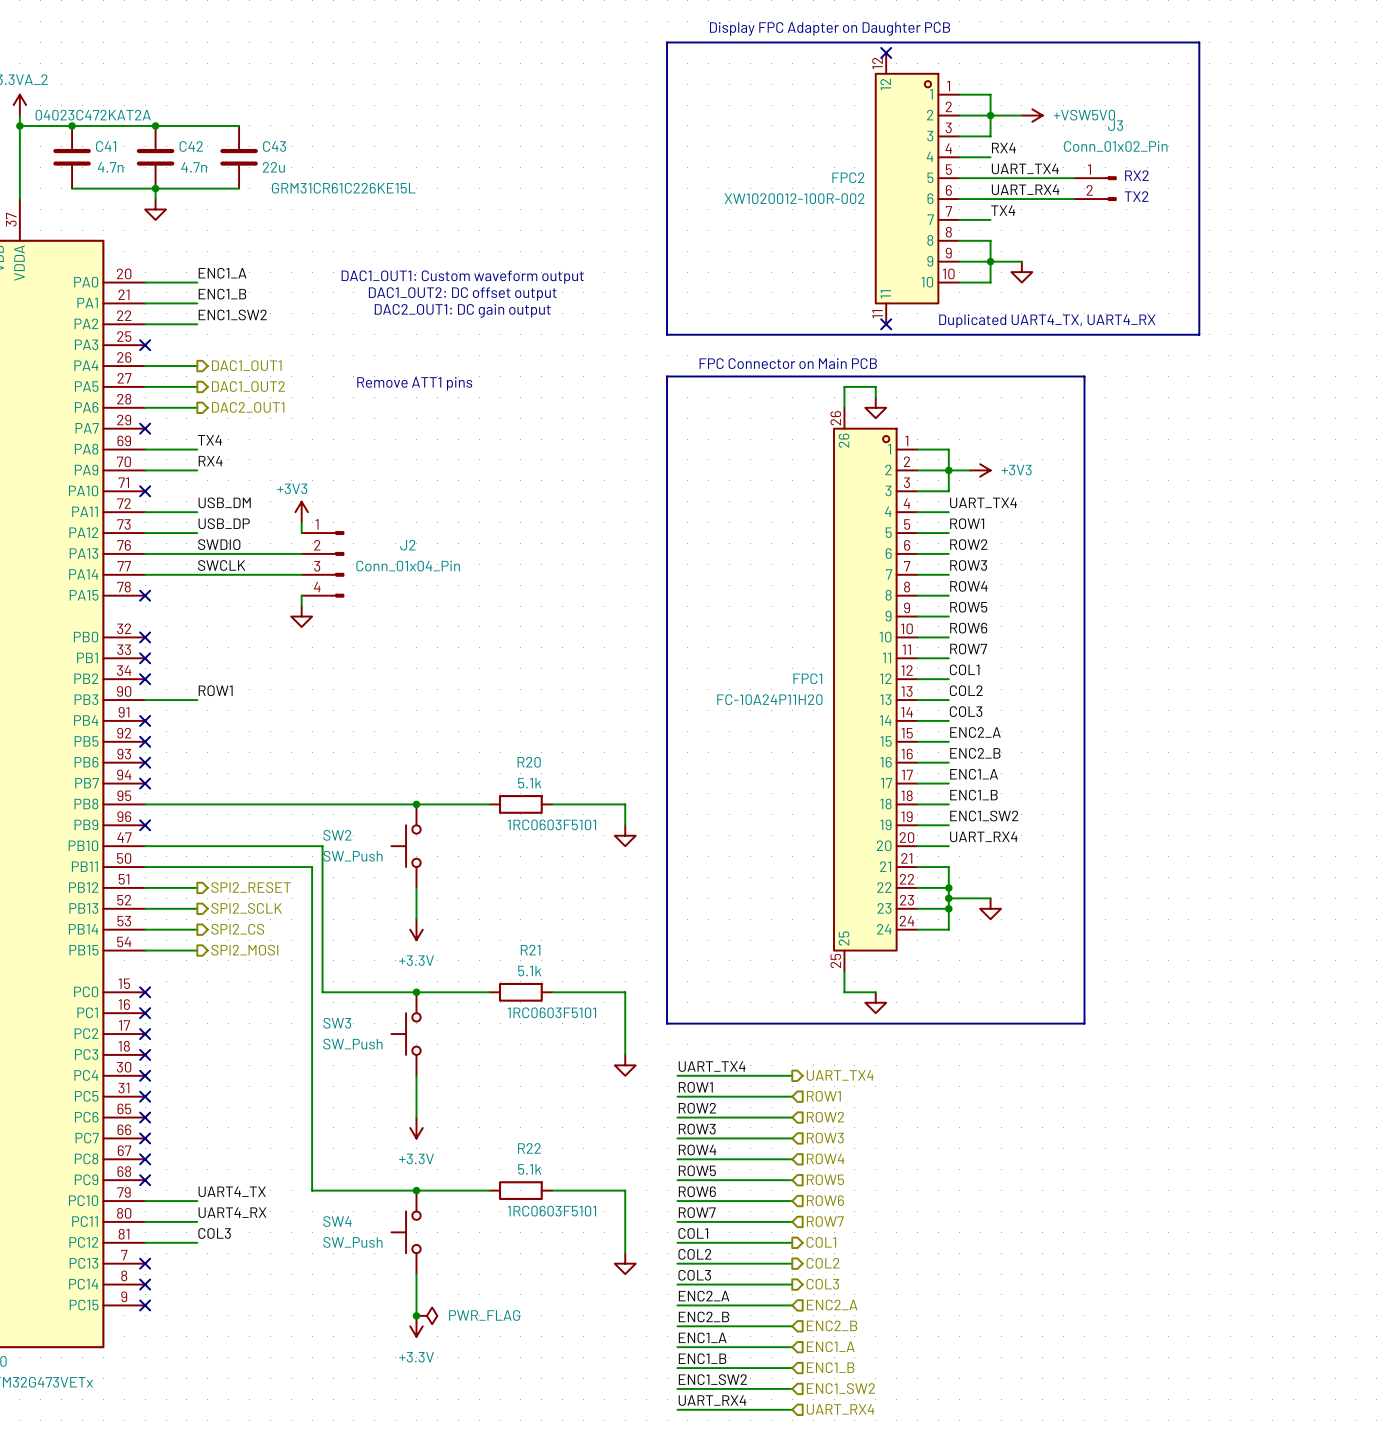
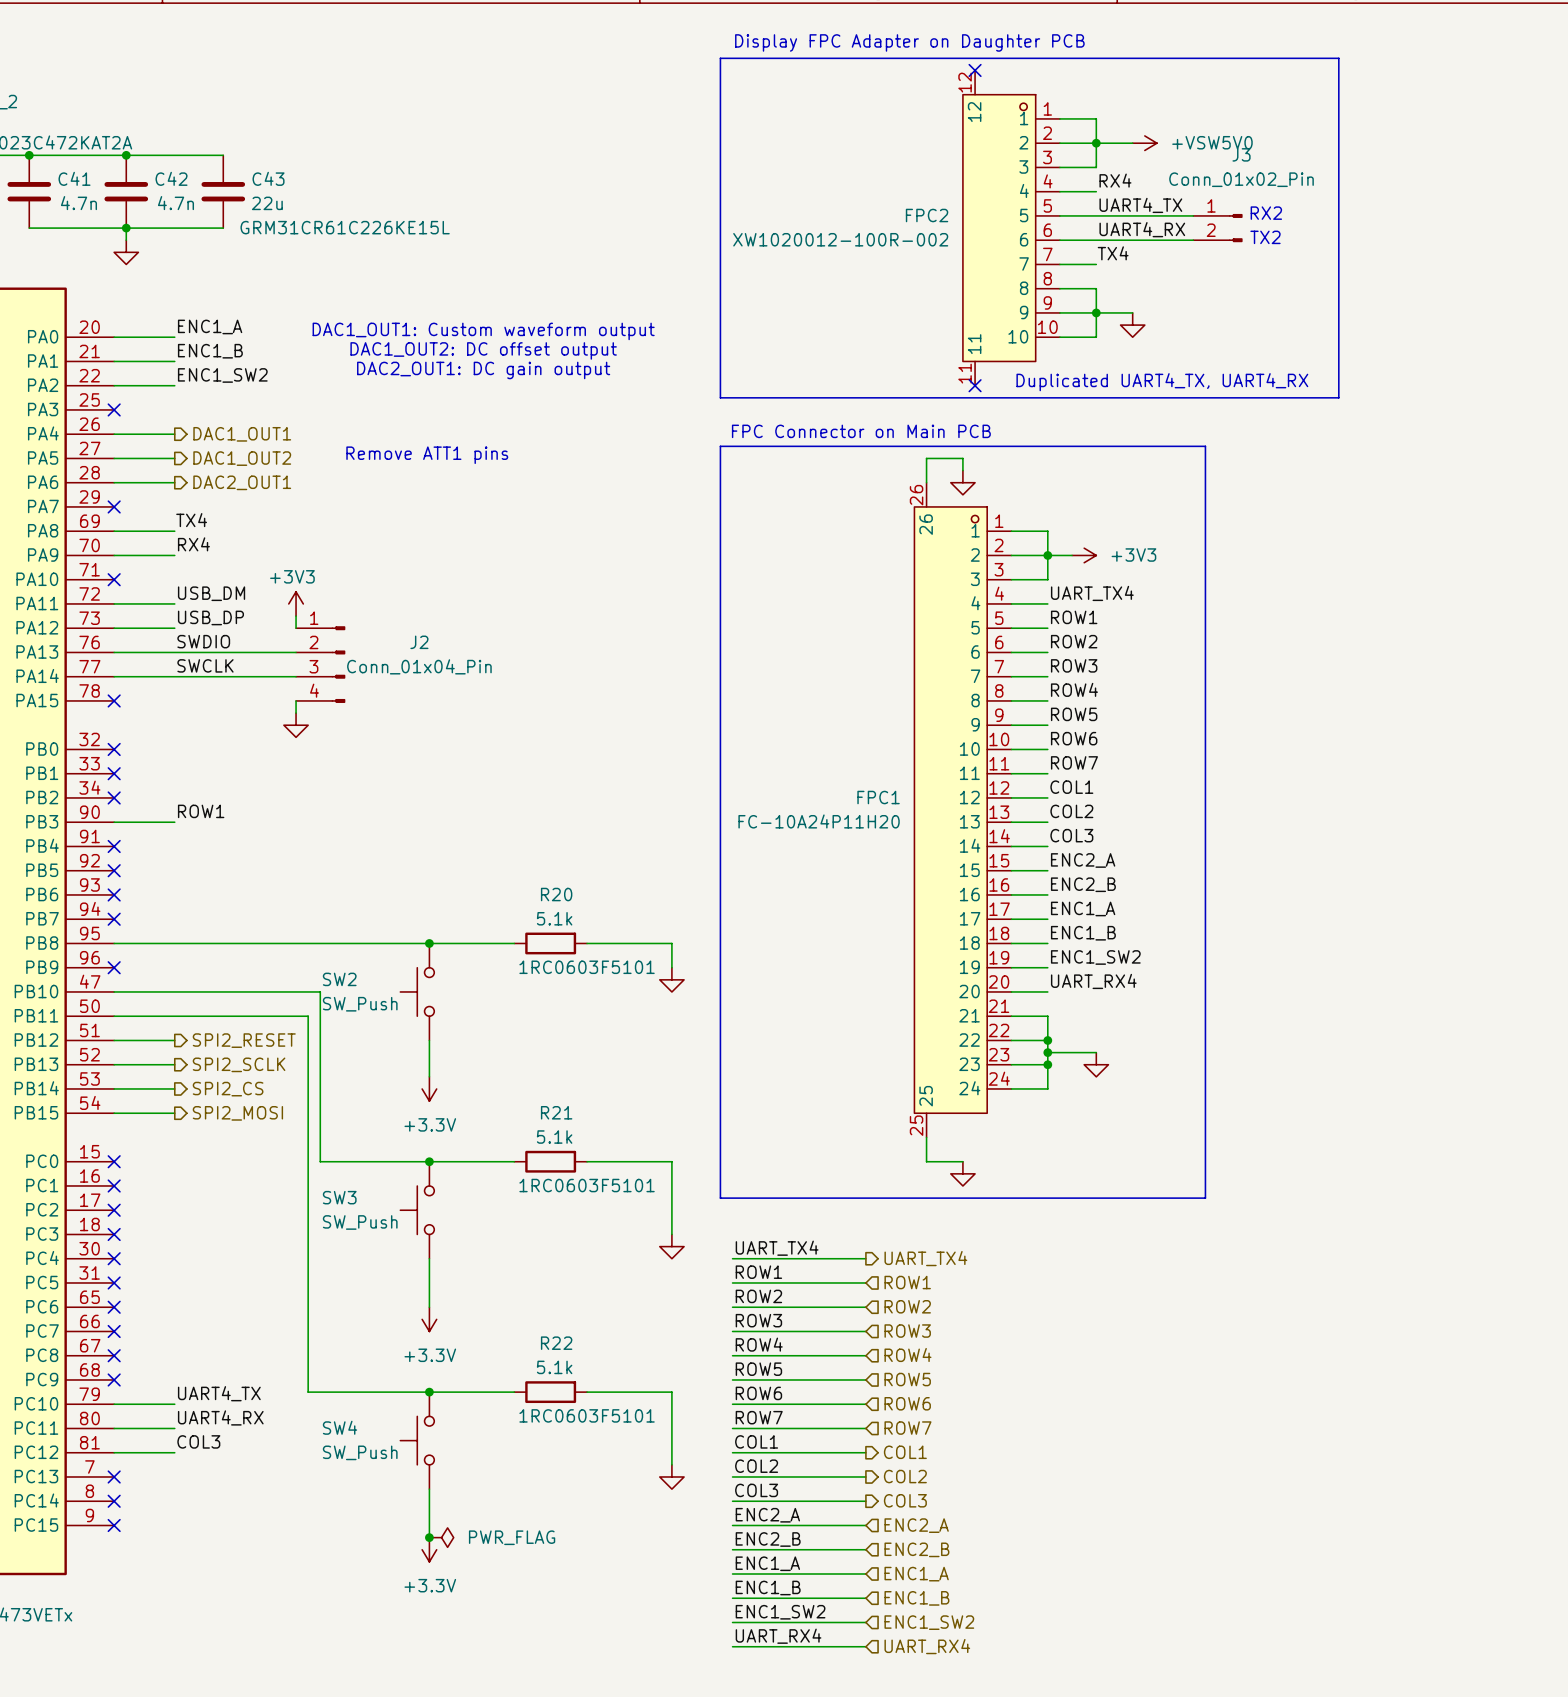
label: UART_TX4 (1025, 168) -> UART4_TX (1140, 205)
label: UART_RX4 (1025, 189) -> UART4_RX (1142, 229)

